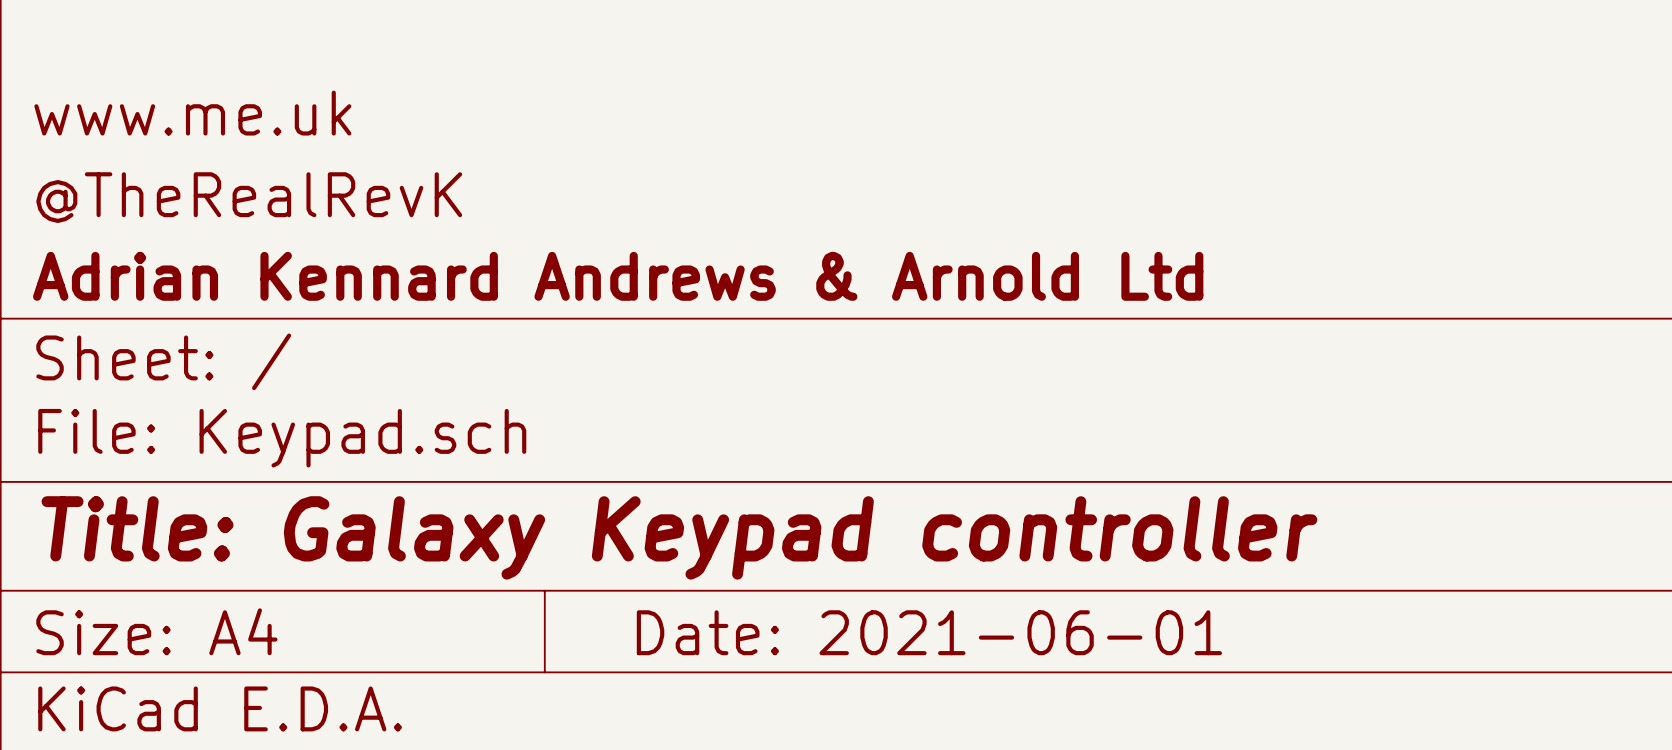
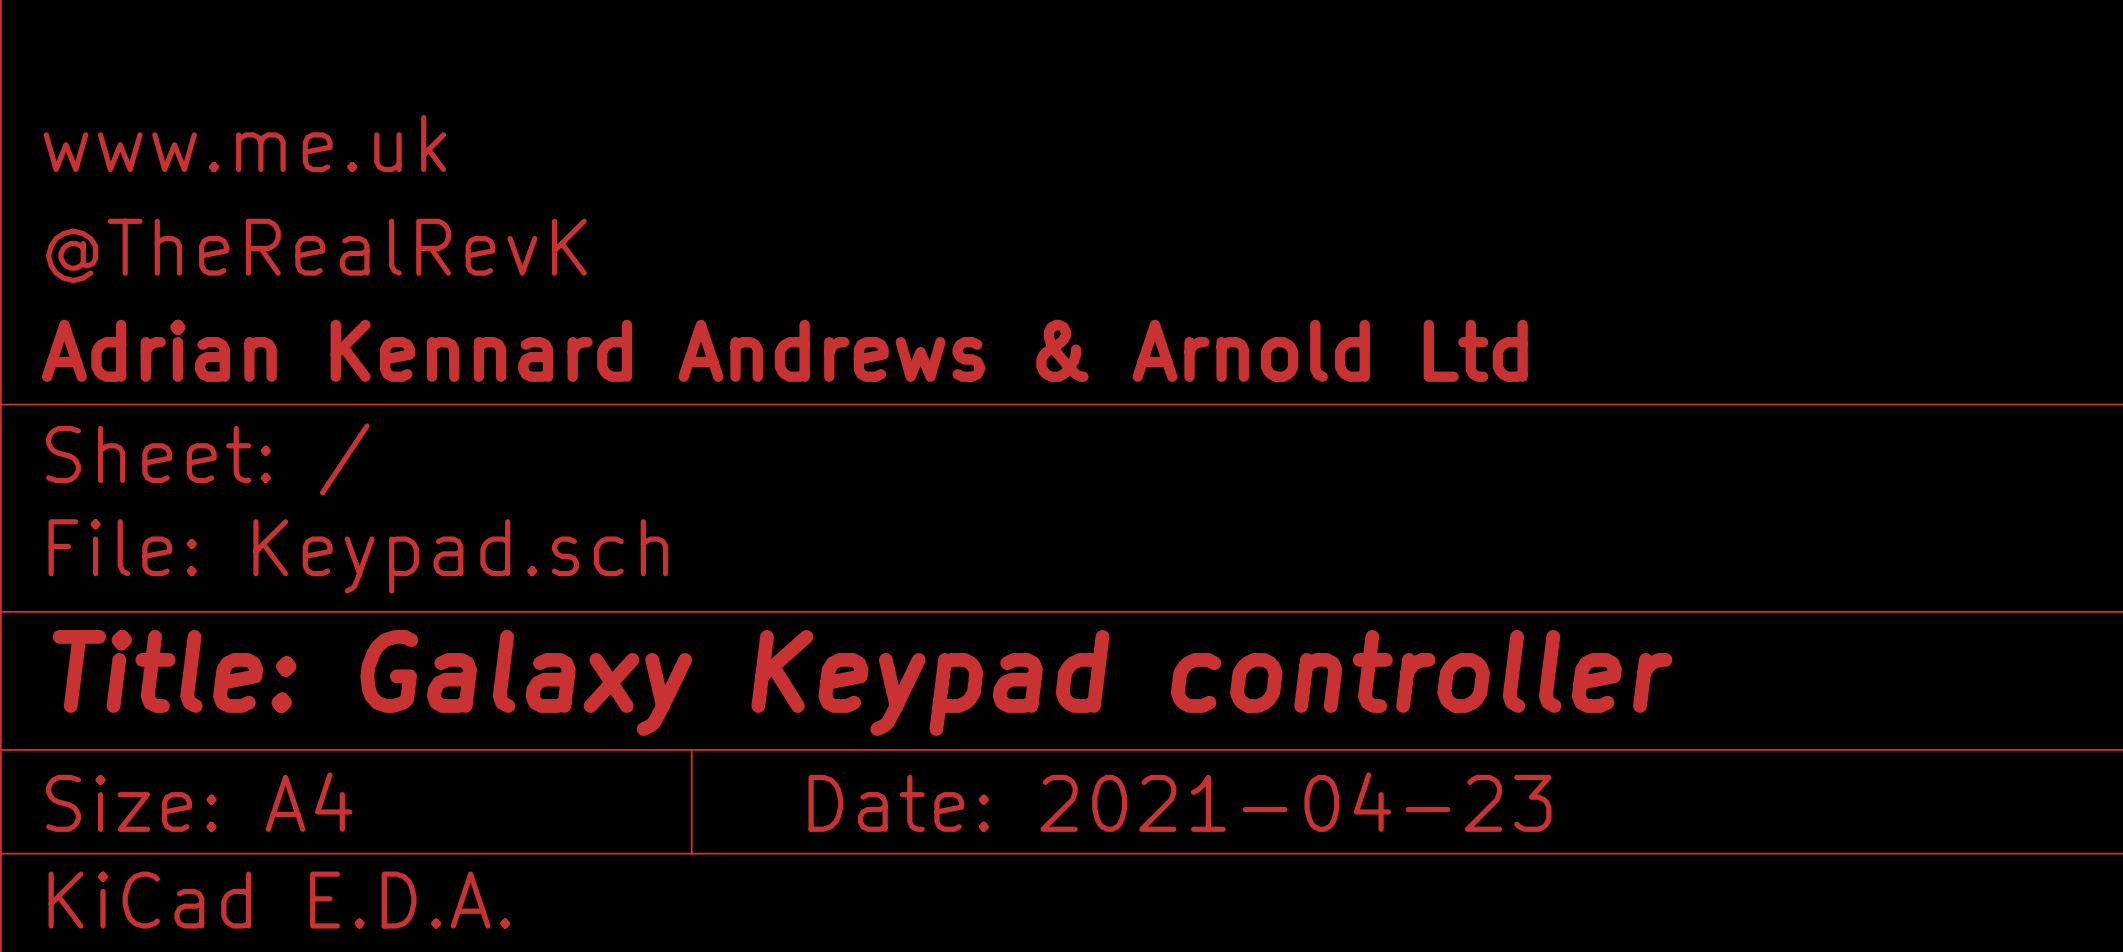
title block: Date: 2021-06-01 (929, 632) -> Date: 2021-04-23 (1180, 802)

